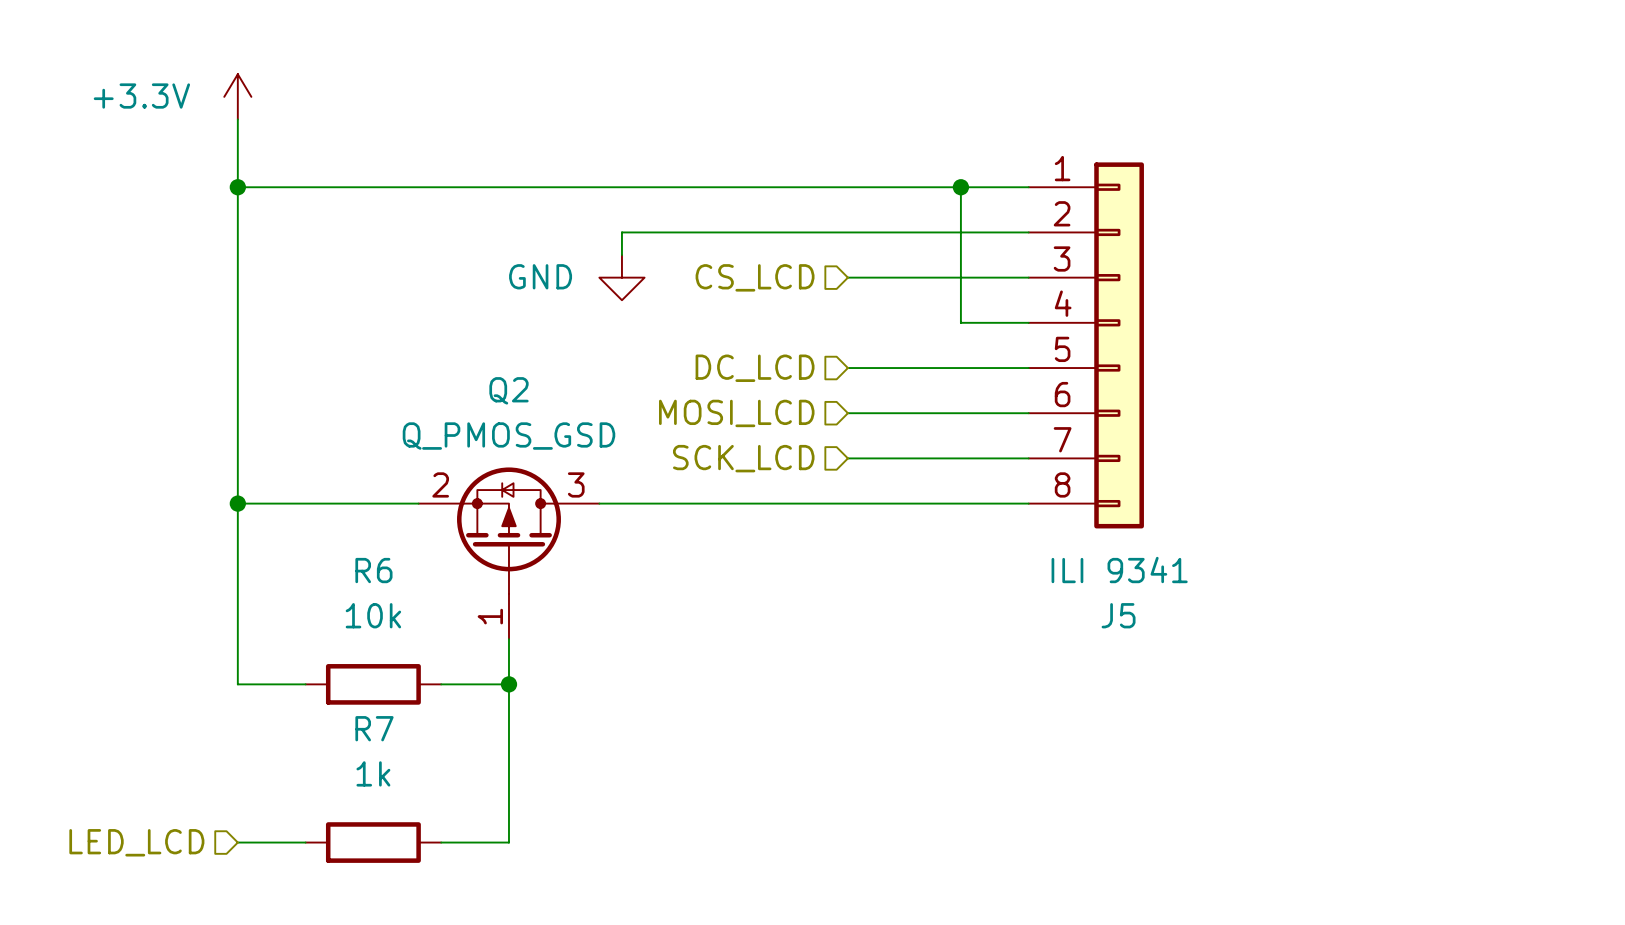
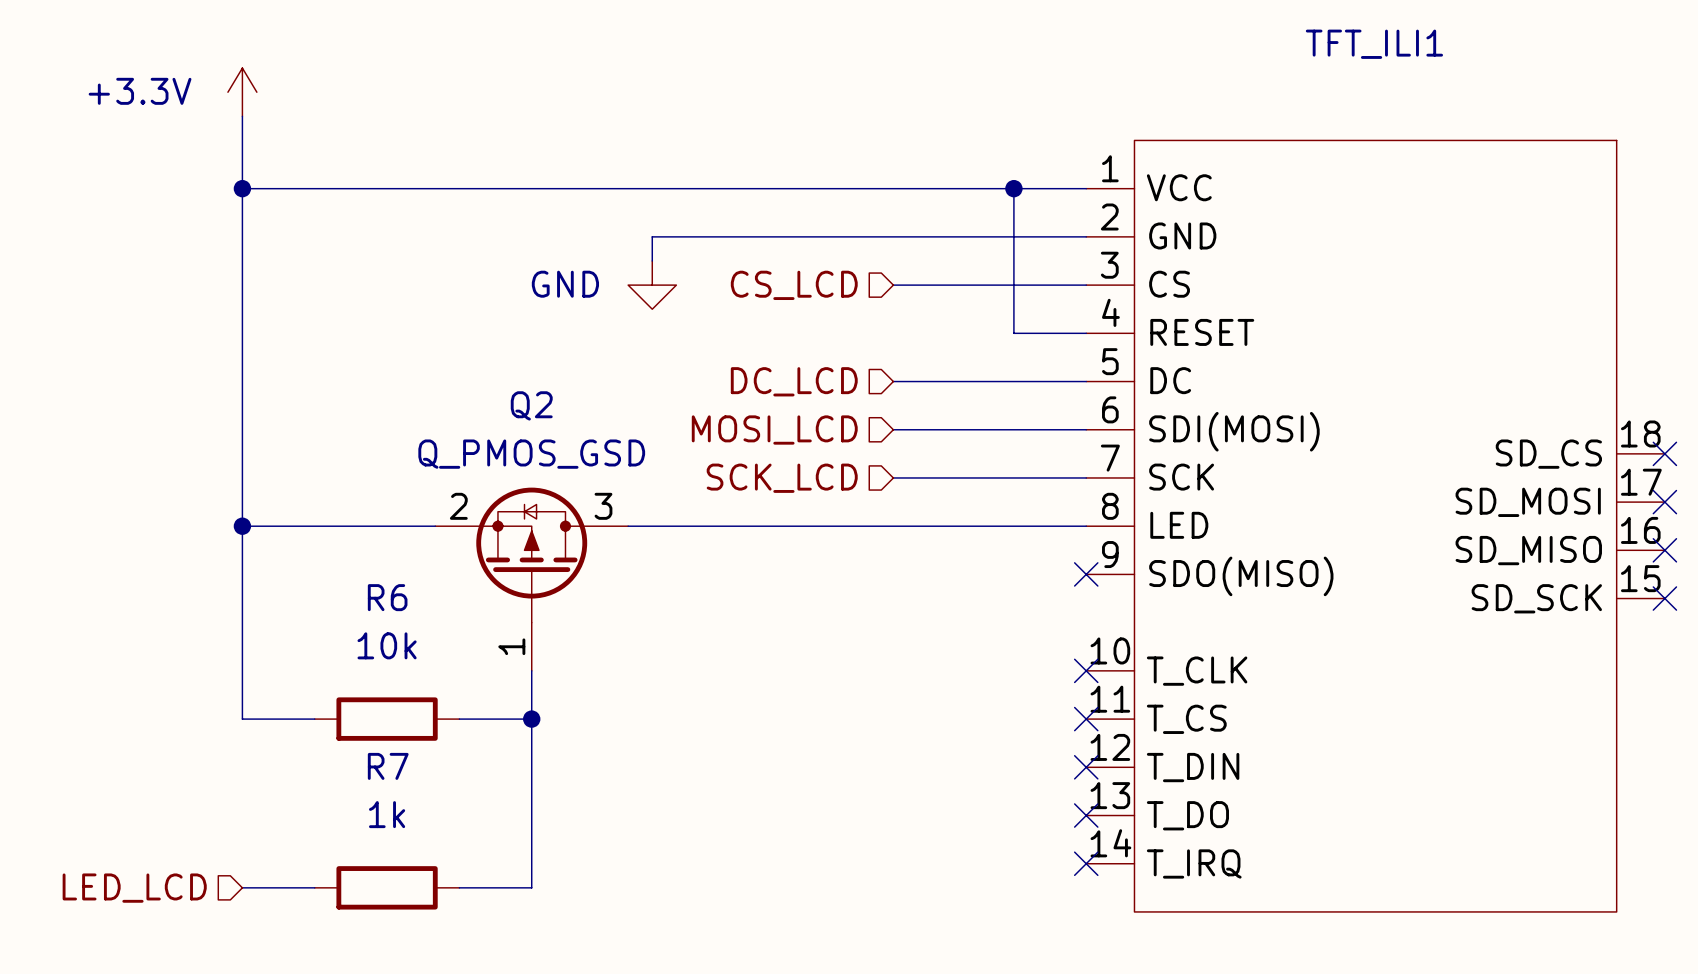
J5: ILI 9341 (1086, 345) -> none
no-connect mark: none -> (1664, 453)
no-connect mark: none -> (1664, 502)
TFT_ILI1: none -> (1375, 526)
no-connect mark: none -> (1664, 550)
no-connect mark: none -> (1086, 574)
no-connect mark: none -> (1664, 598)
no-connect mark: none -> (1086, 670)
no-connect mark: none -> (1086, 719)
no-connect mark: none -> (1086, 767)
no-connect mark: none -> (1086, 815)
no-connect mark: none -> (1086, 863)

